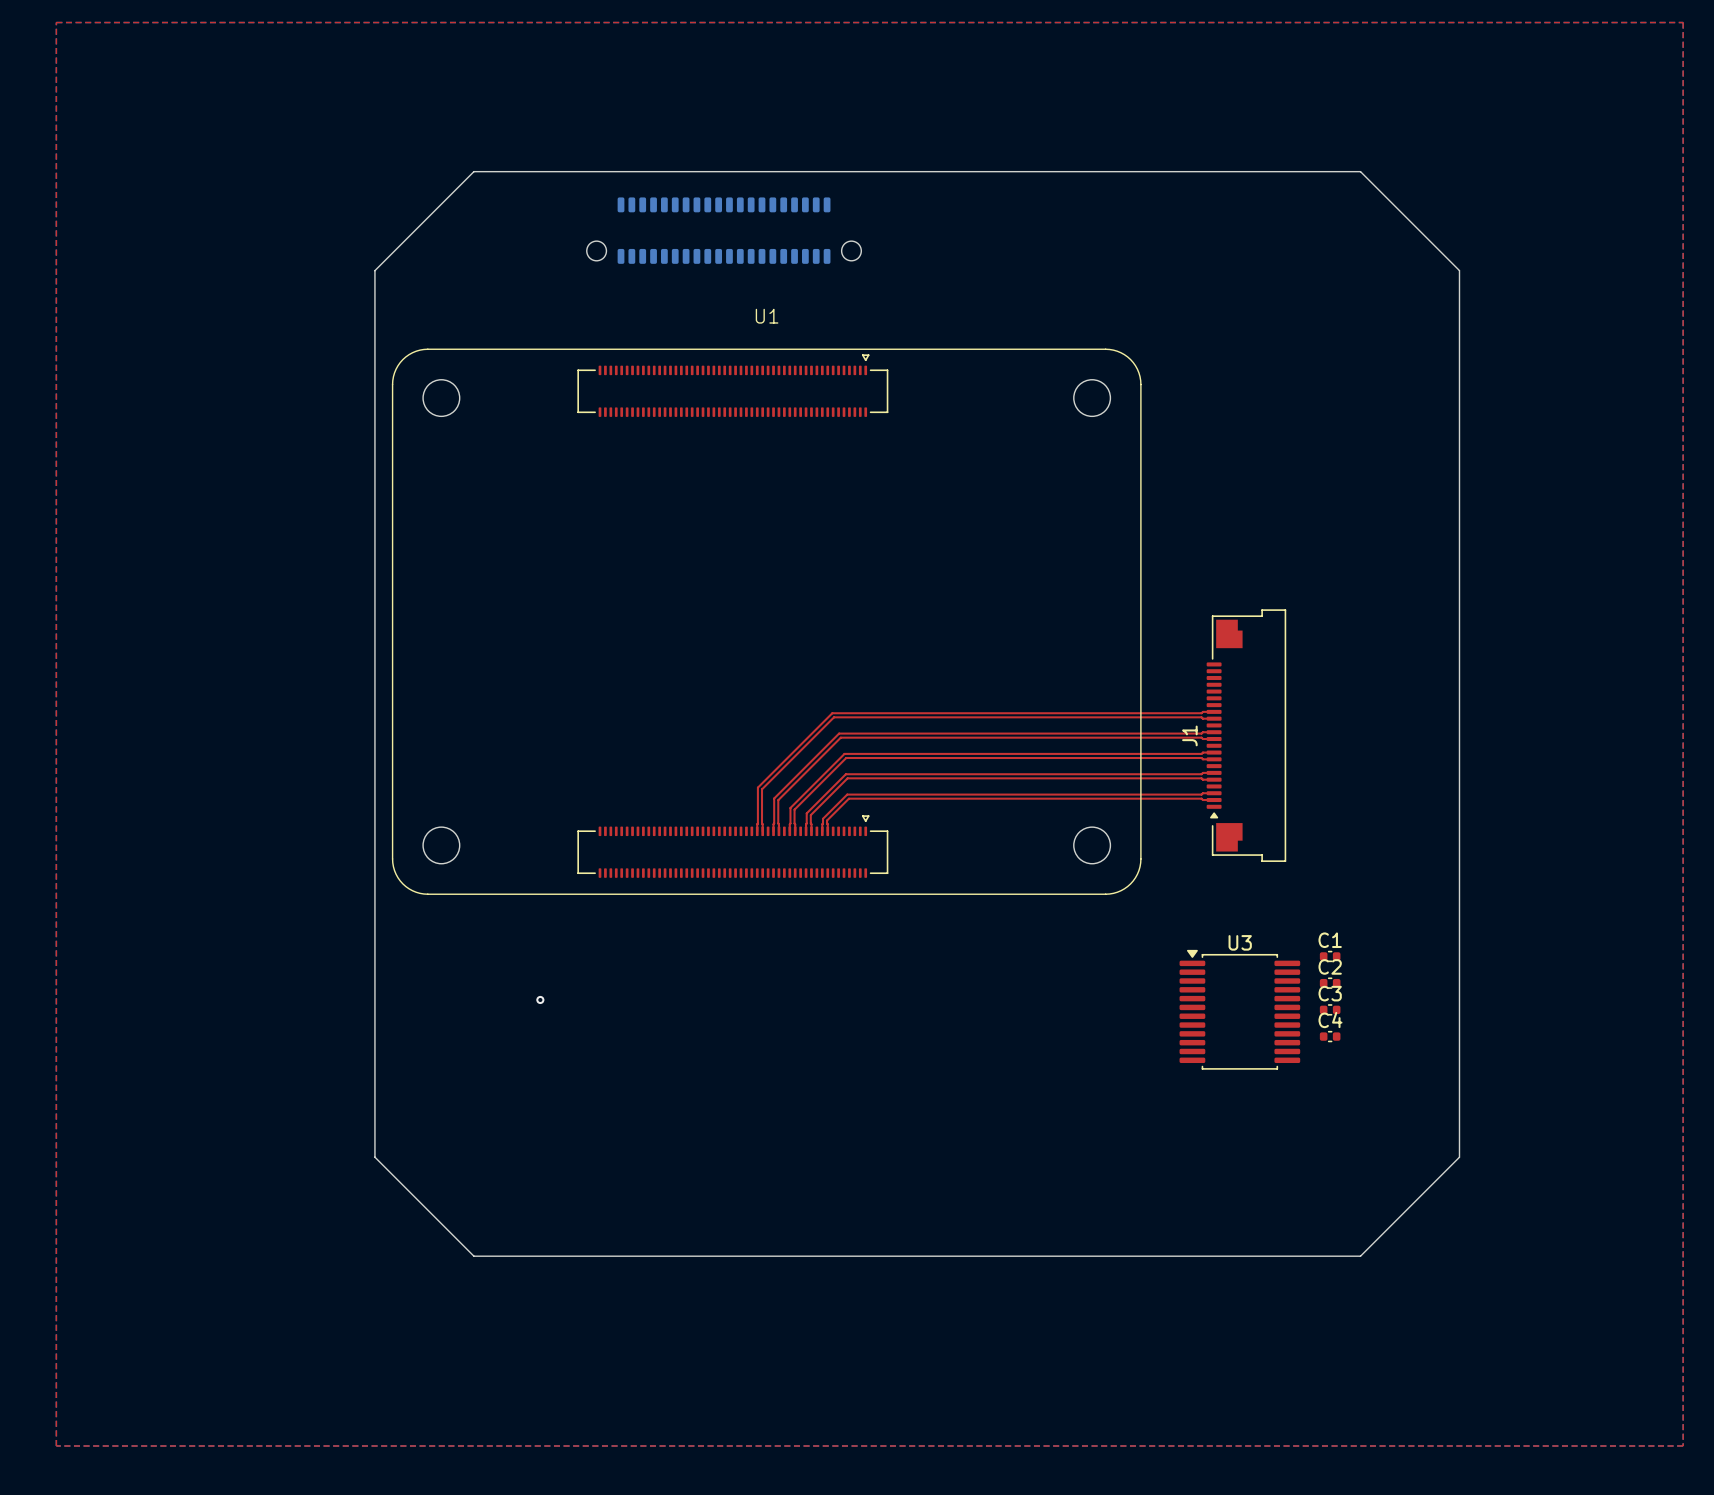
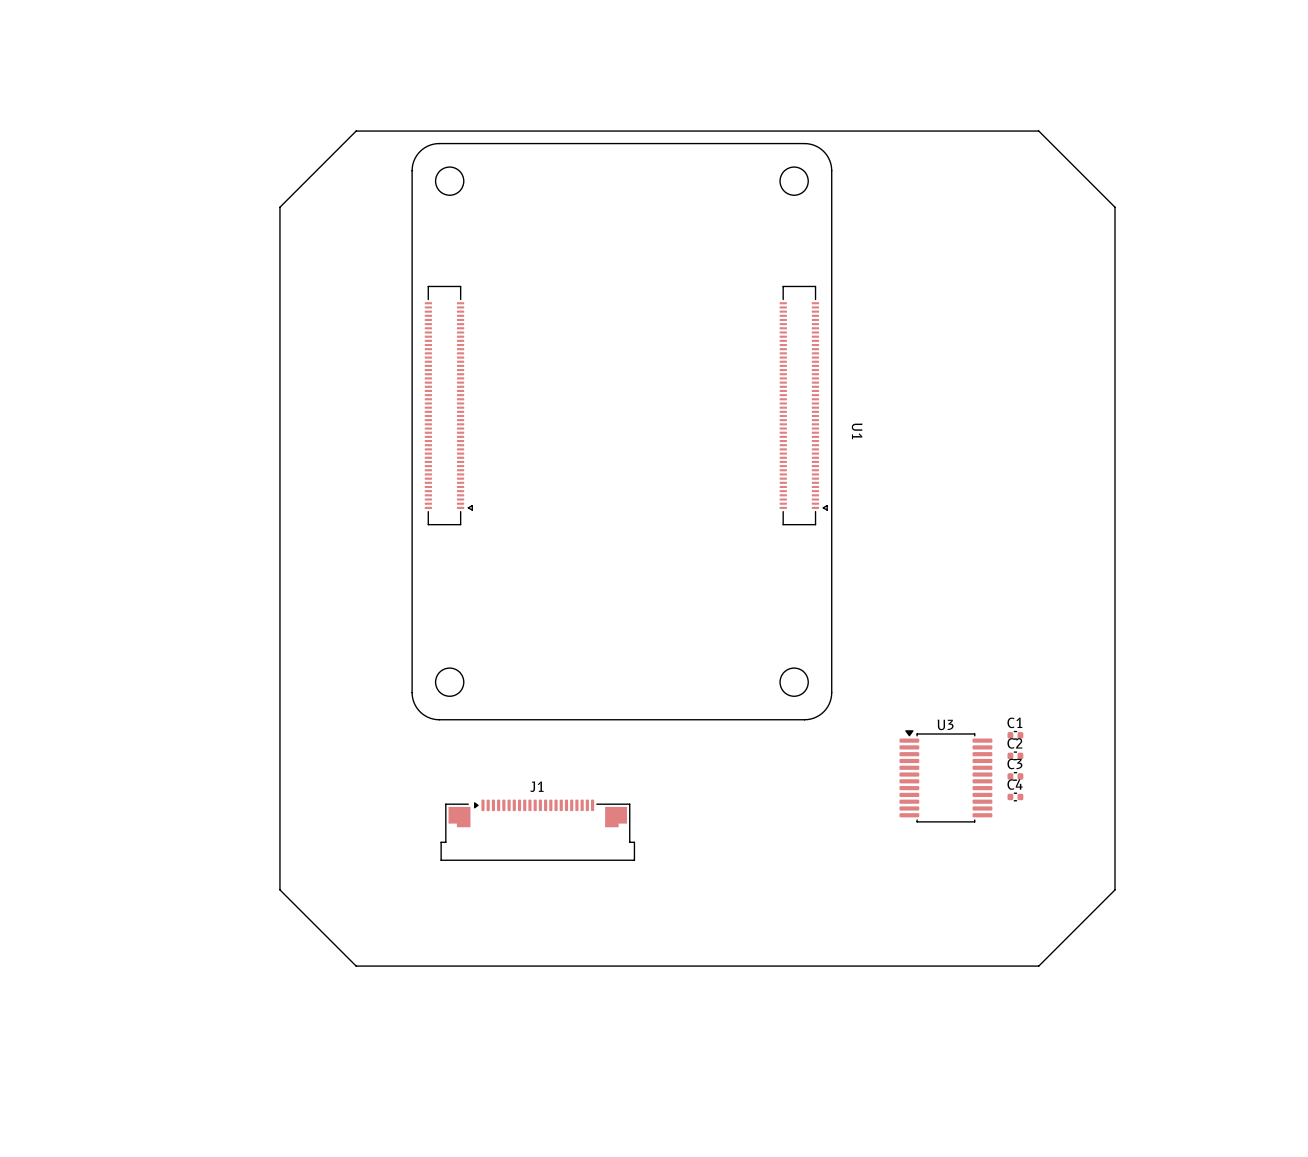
top zone outline: (56, 22) (1683, 22) (1683, 1445) (56, 1445) (56, 22) -> none
part: (724, 230) -> none
U1 rotation: 0° (766, 621) -> 90° clockwise (621, 431)
top track: (1214, 711) (832, 713) (757, 787) (757, 831) -> none
top track: (1214, 718) (834, 717) (762, 789) (762, 831) -> none
top track: (1214, 732) (839, 733) (774, 798) (773, 831) -> none
J1 rotation: 0° (1246, 735) -> 90° clockwise (537, 830)
J1 position: (1246, 735) -> (537, 830)
top track: (1214, 739) (840, 737) (778, 800) (778, 831) -> none
top track: (1214, 752) (844, 753) (790, 807) (789, 831) -> none
top track: (1214, 759) (846, 758) (794, 809) (795, 831) -> none
top track: (1214, 772) (845, 774) (806, 813) (806, 831) -> none
top track: (1214, 779) (847, 778) (810, 815) (811, 831) -> none
top track: (1214, 793) (847, 794) (822, 818) (822, 831) -> none
top track: (1214, 800) (848, 798) (827, 820) (827, 831) -> none
via: (540, 999) -> none

